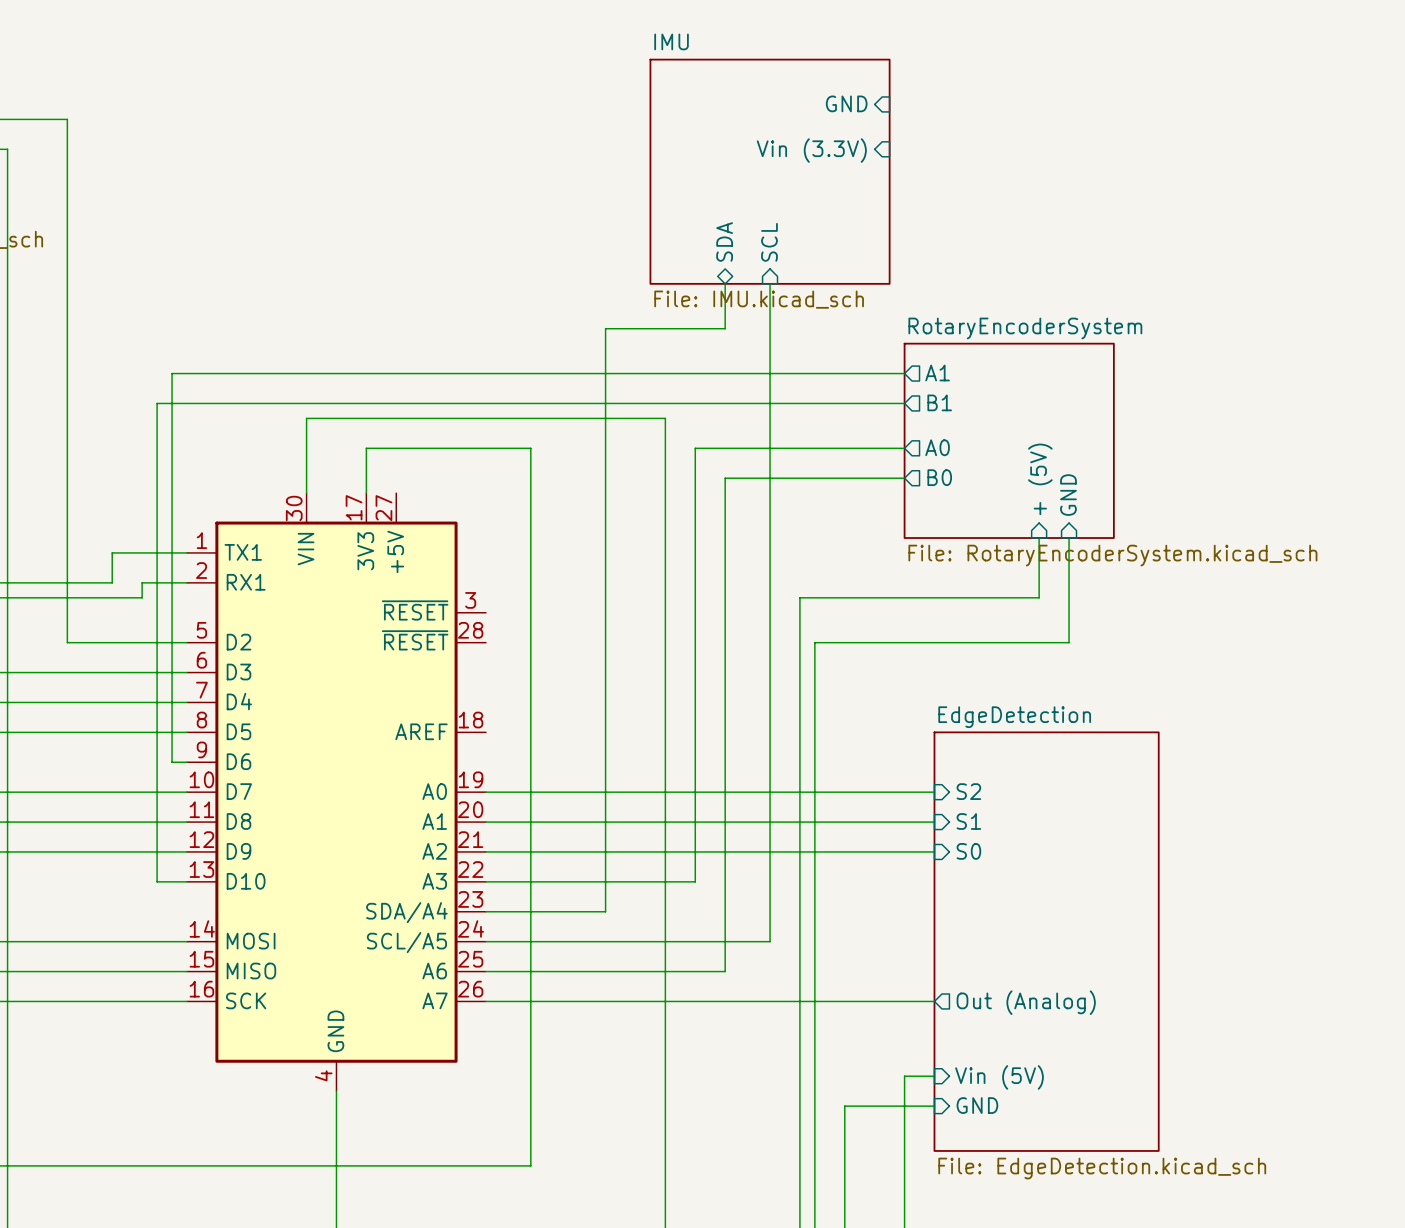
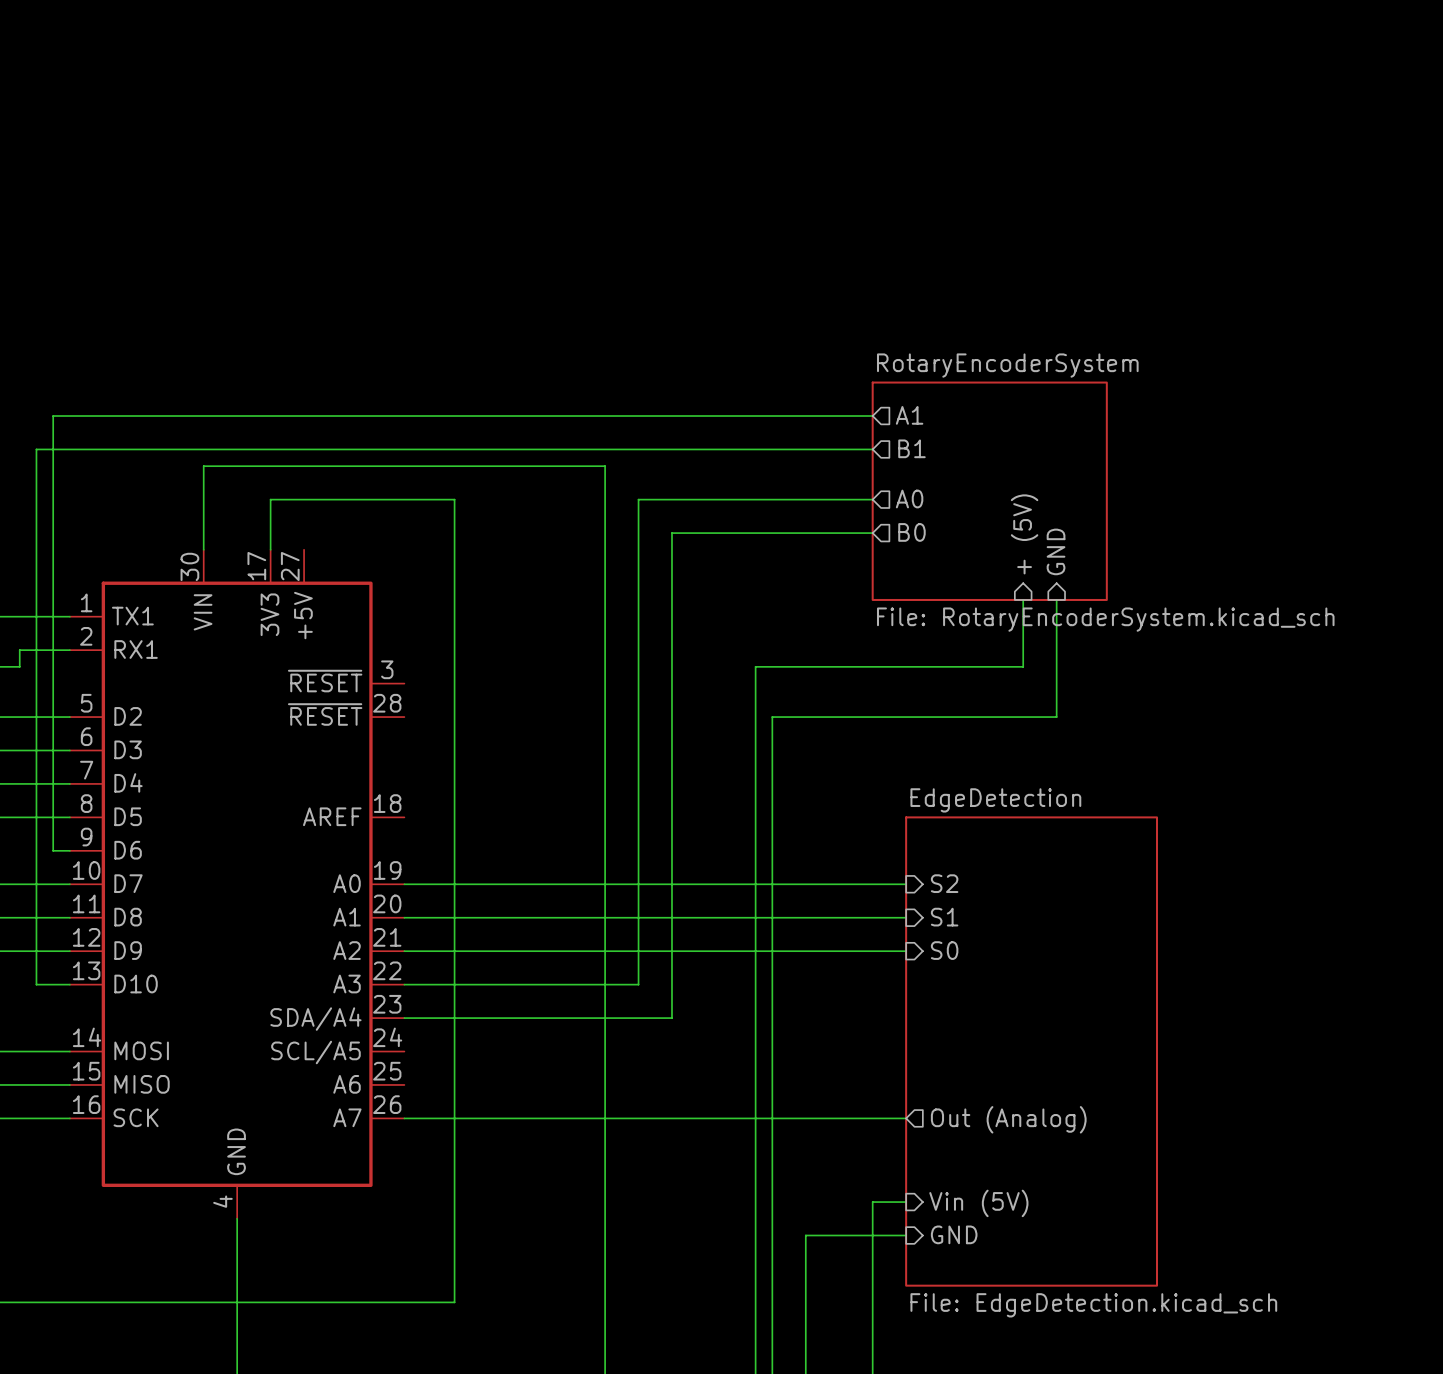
sheet pin: GND (846, 103) -> none
sheet pin: Vin (3.3V) (811, 150) -> none
sheet IMU: File: IMU.kicad_sch (770, 171) -> none
sheet pin: SDA (724, 241) -> none
sheet pin: SCL (769, 242) -> none
wire: (725, 283) (725, 328) (605, 328) (605, 911) -> none
wire: (770, 283) (770, 941) (485, 941) -> none
wire: (725, 911) (725, 971) (485, 971) -> (671, 1018) (538, 1018)

